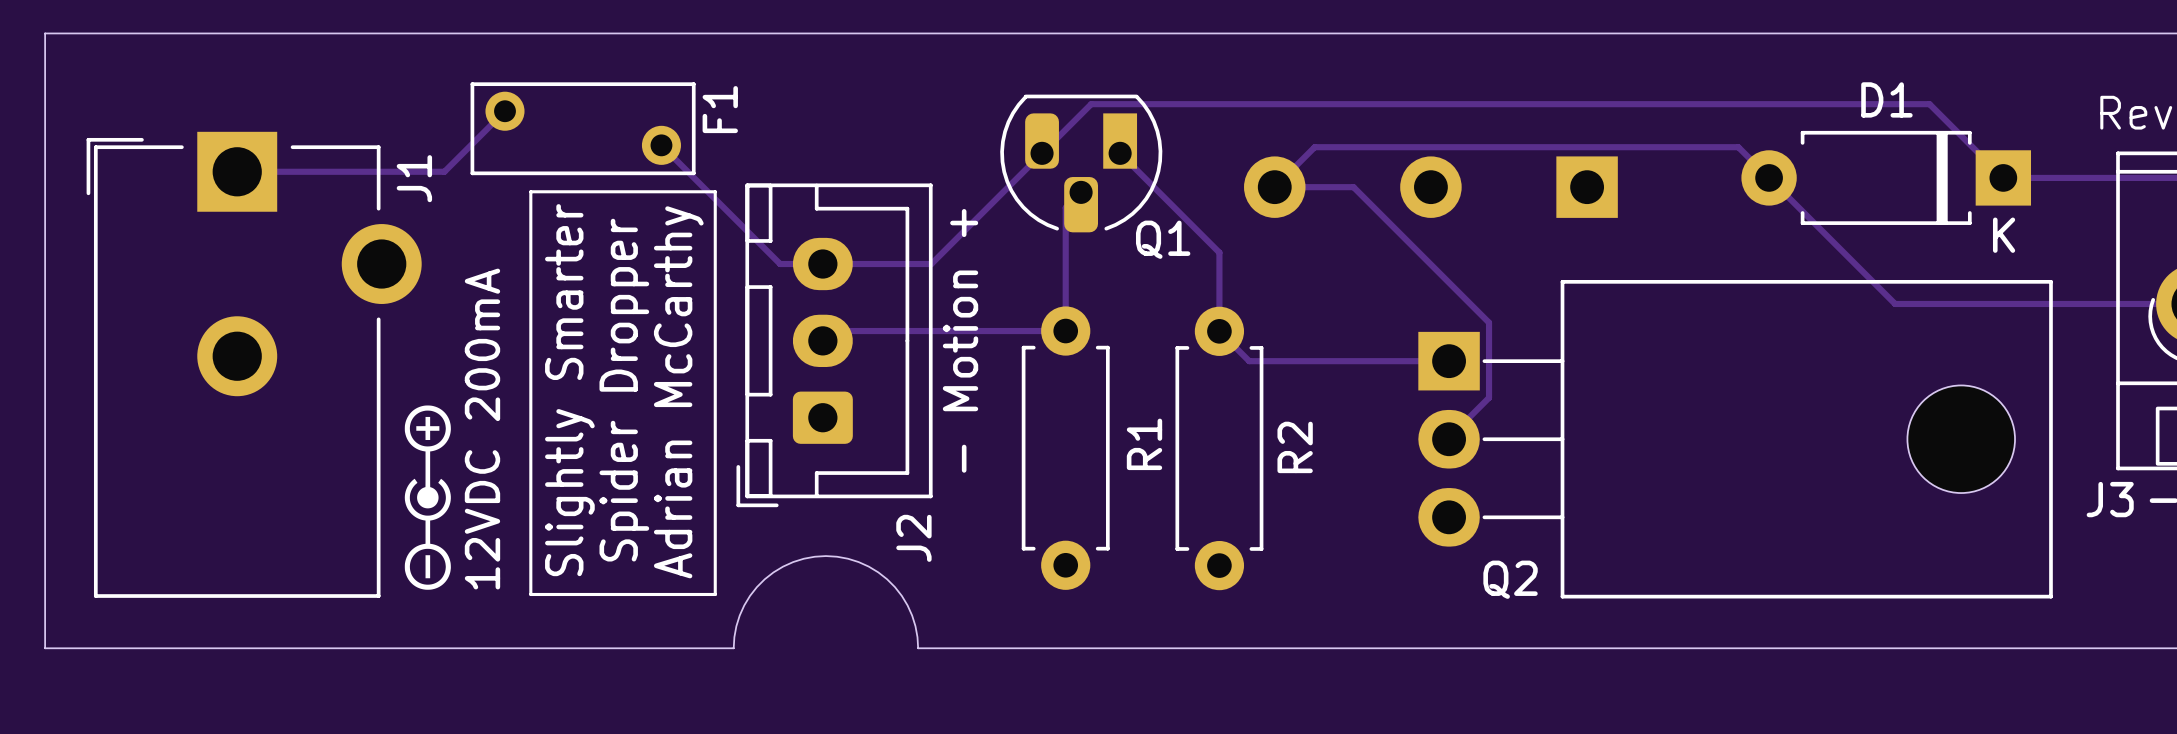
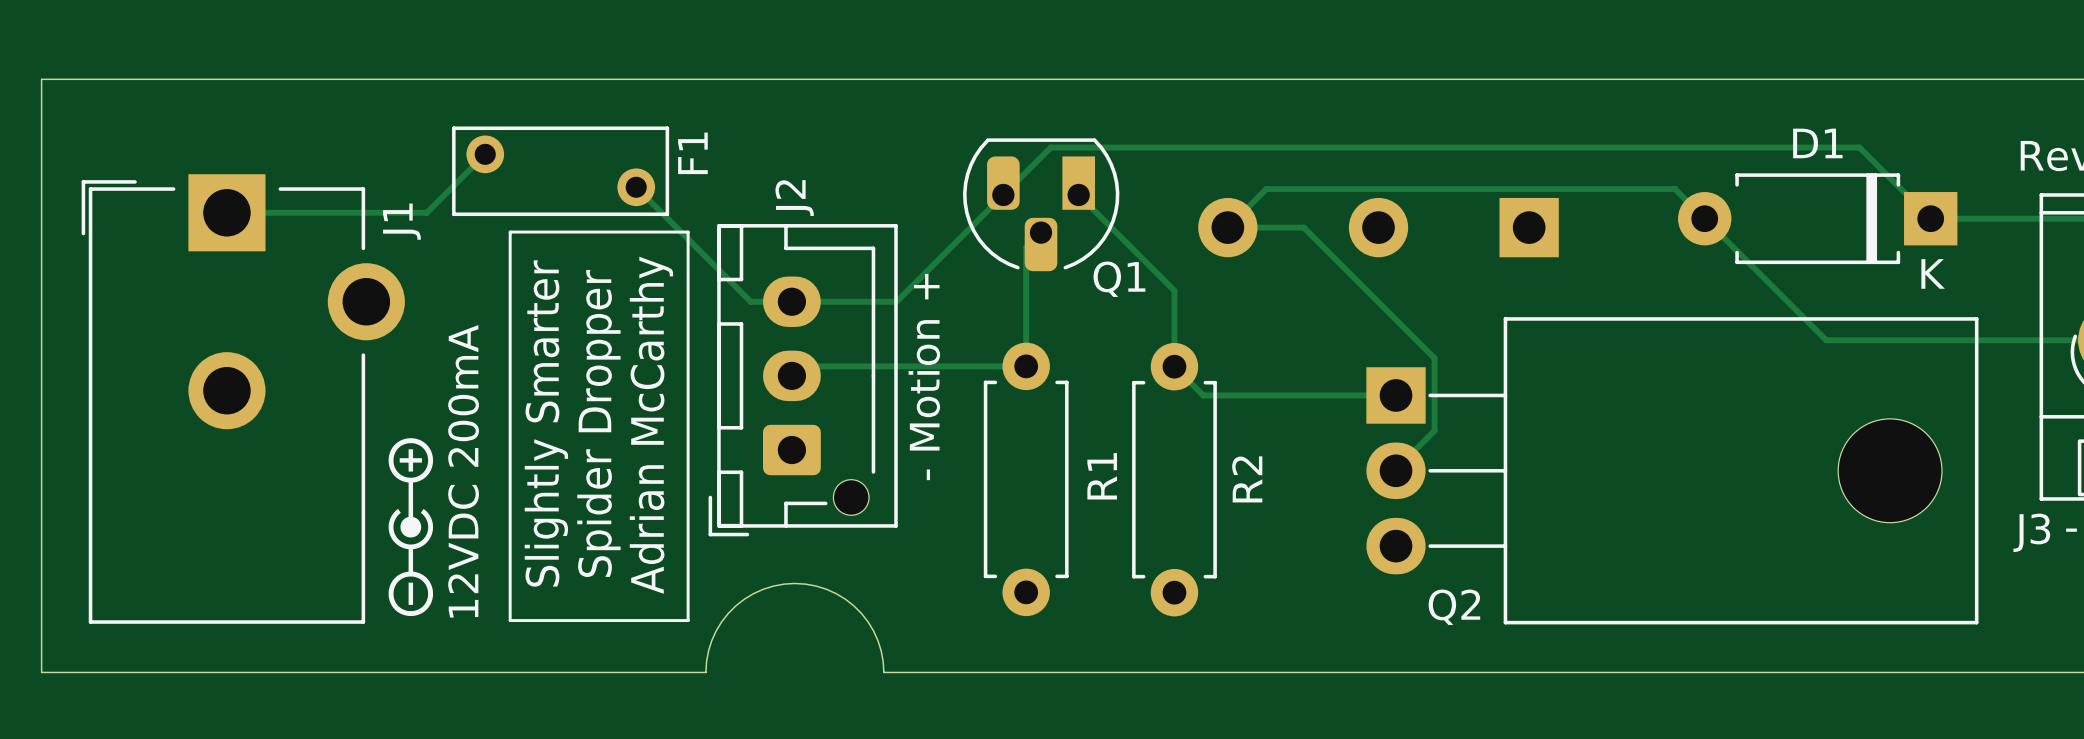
J2 footprint: [736, 183, 933, 508] -> [708, 224, 898, 537]
J2 name position: J2 (913, 538) -> J2 (794, 198)

